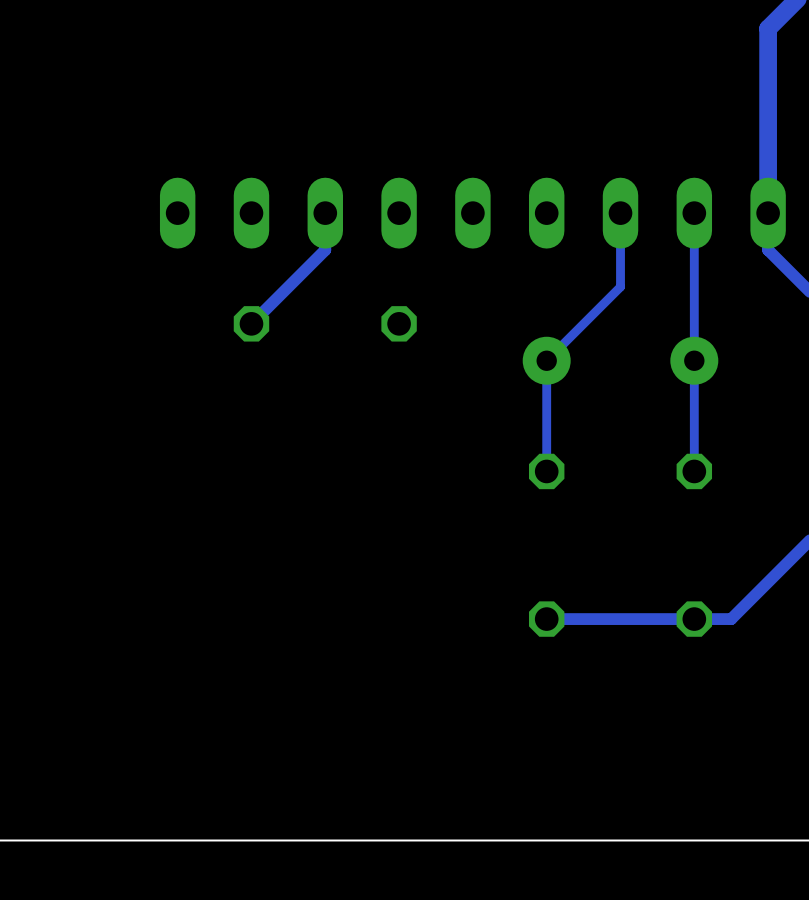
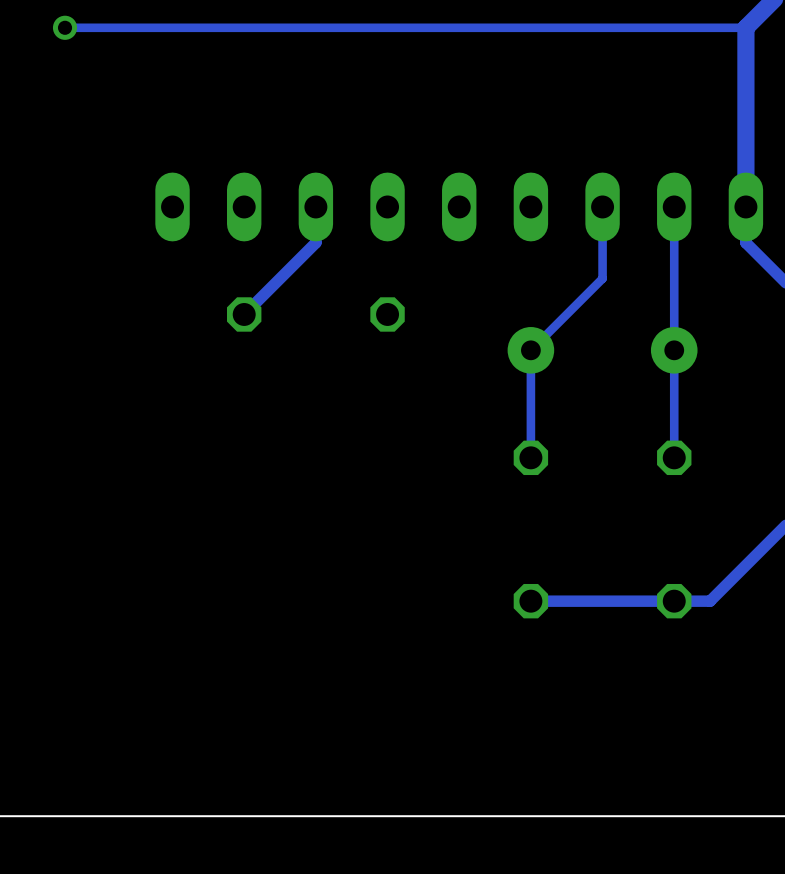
via: none -> (65, 27)
track: none -> (745, 27) (65, 27)

